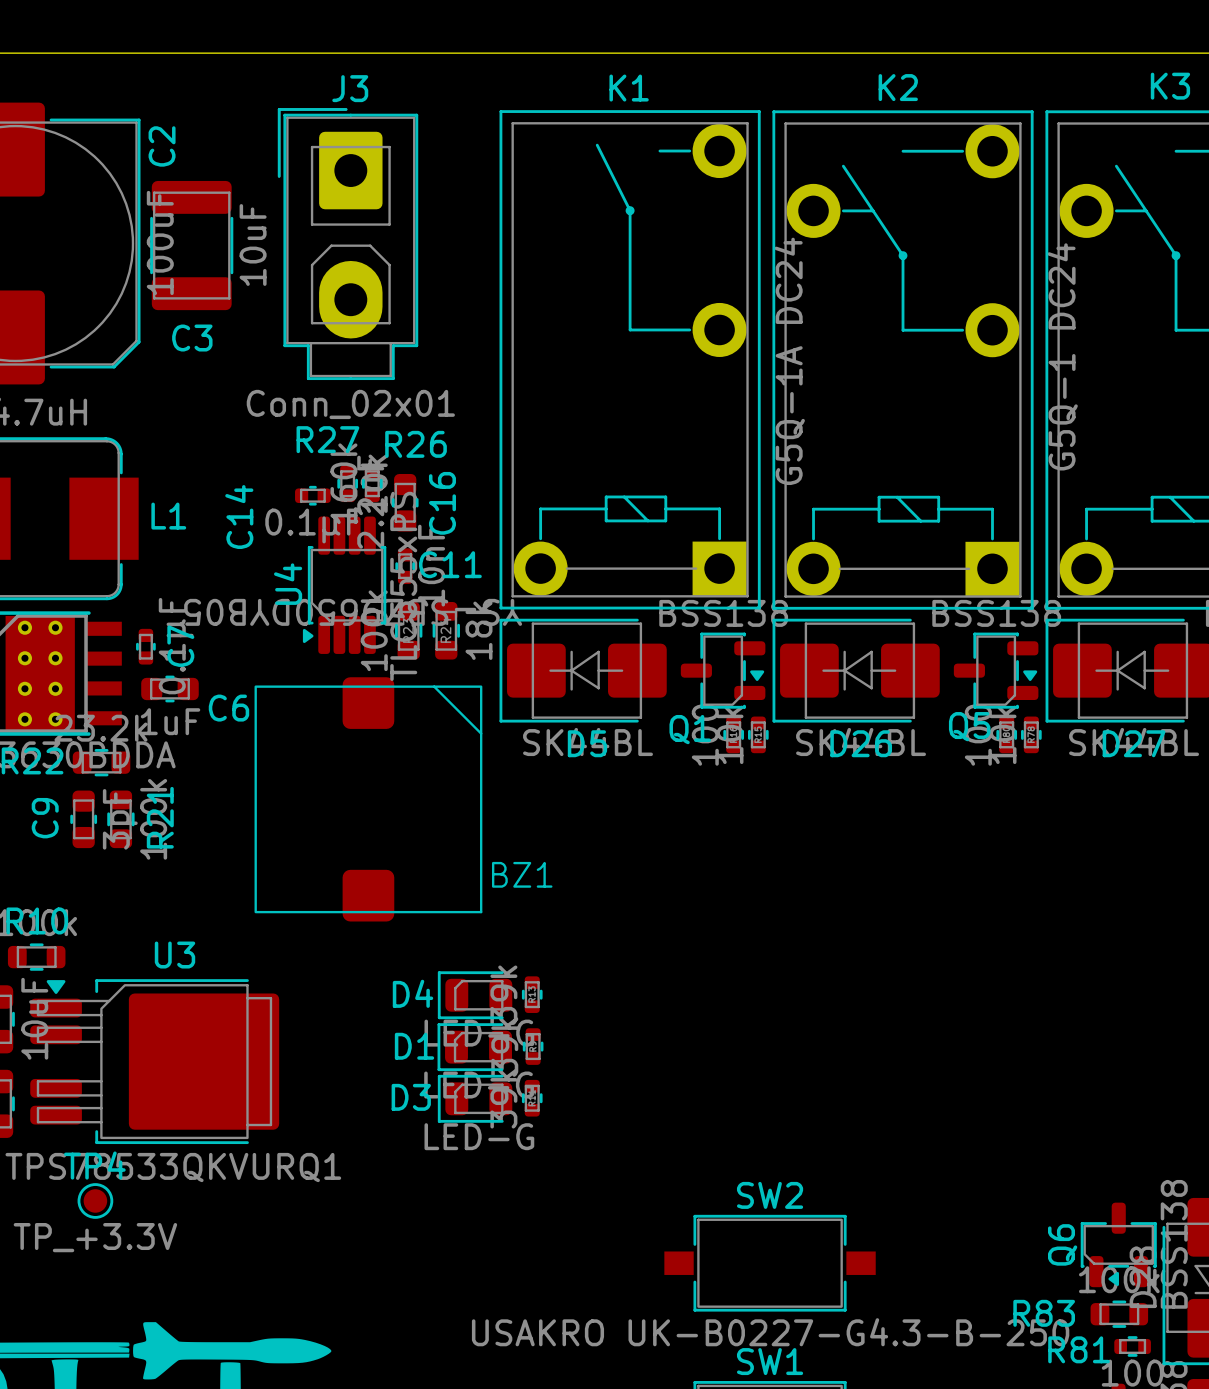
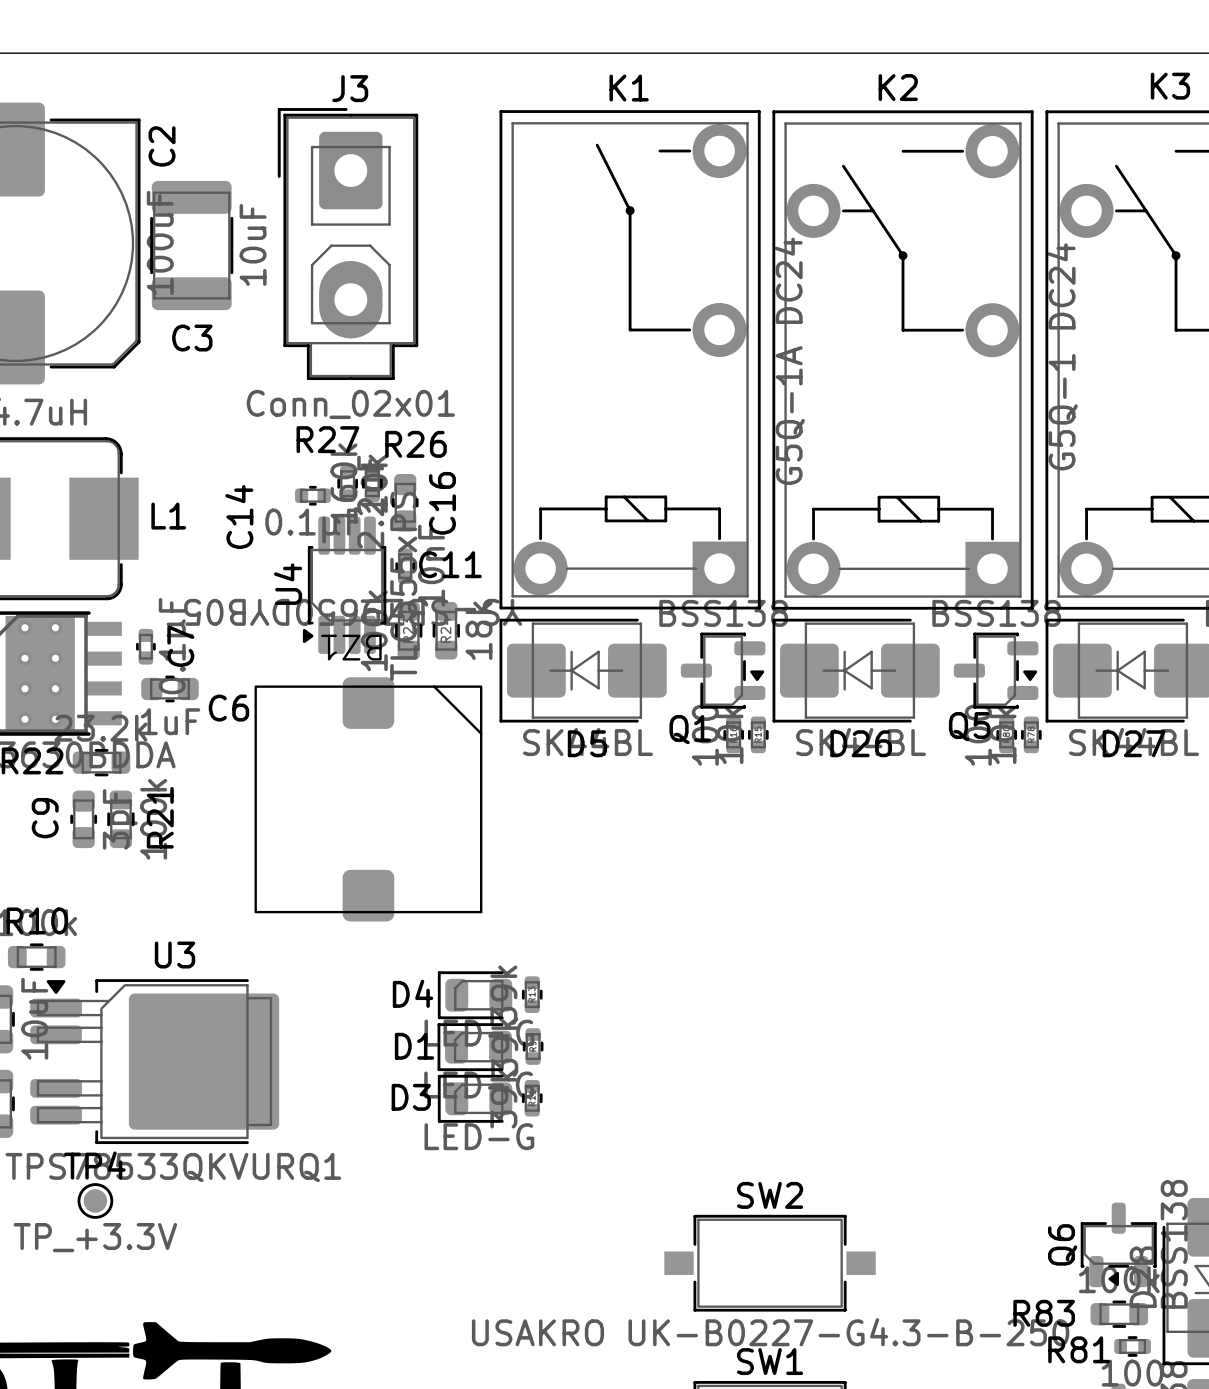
BZ1 name rotation: 0° (522, 874) -> 180° (351, 647)
BZ1 name position: BZ1 (522, 874) -> BZ1 (351, 647)

